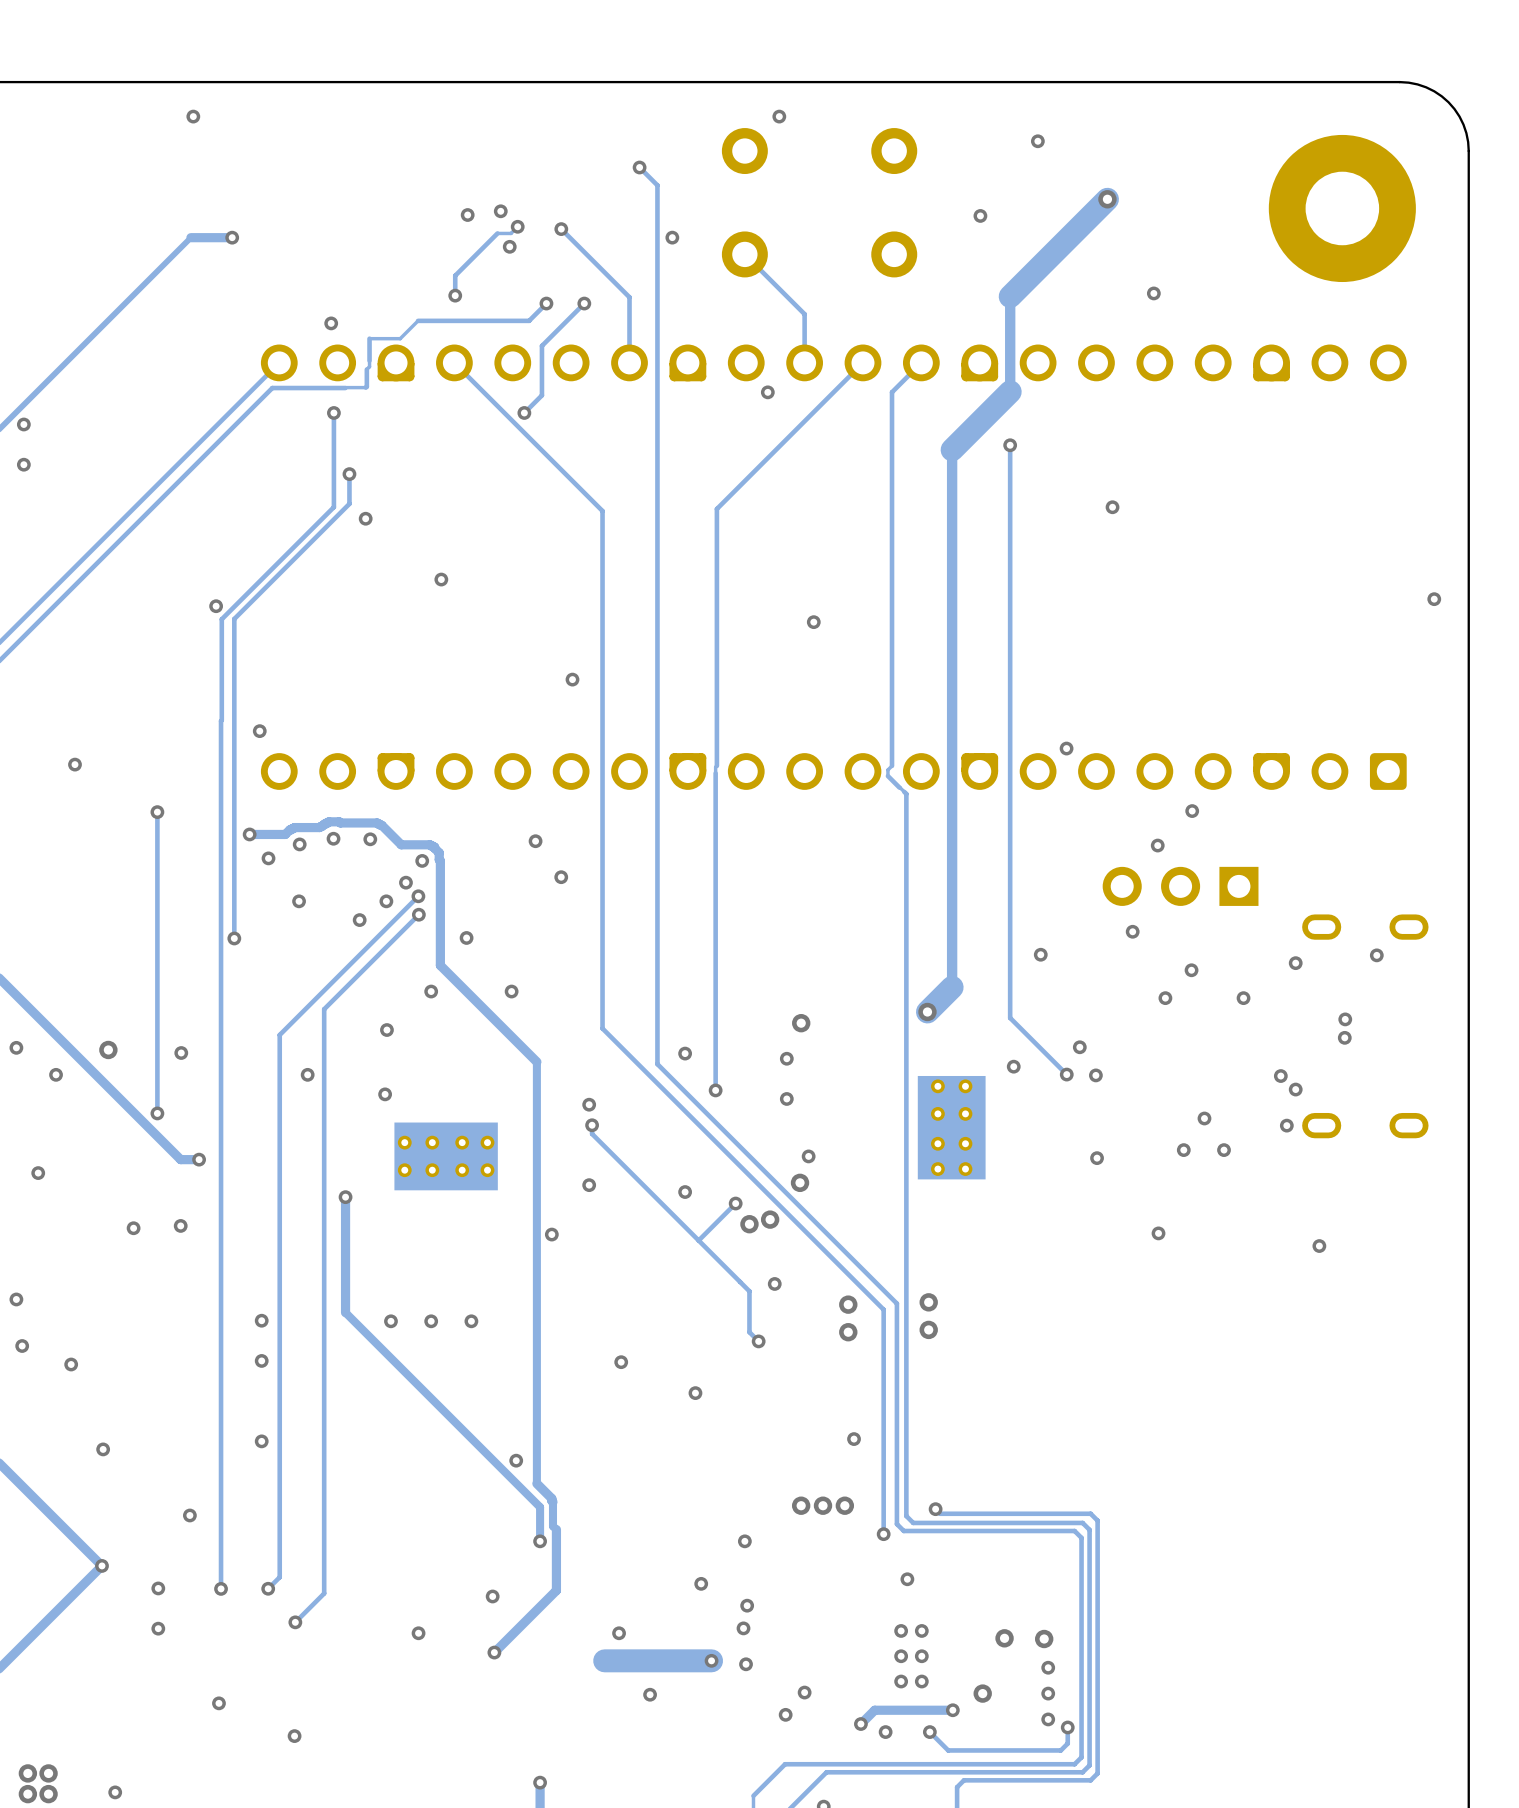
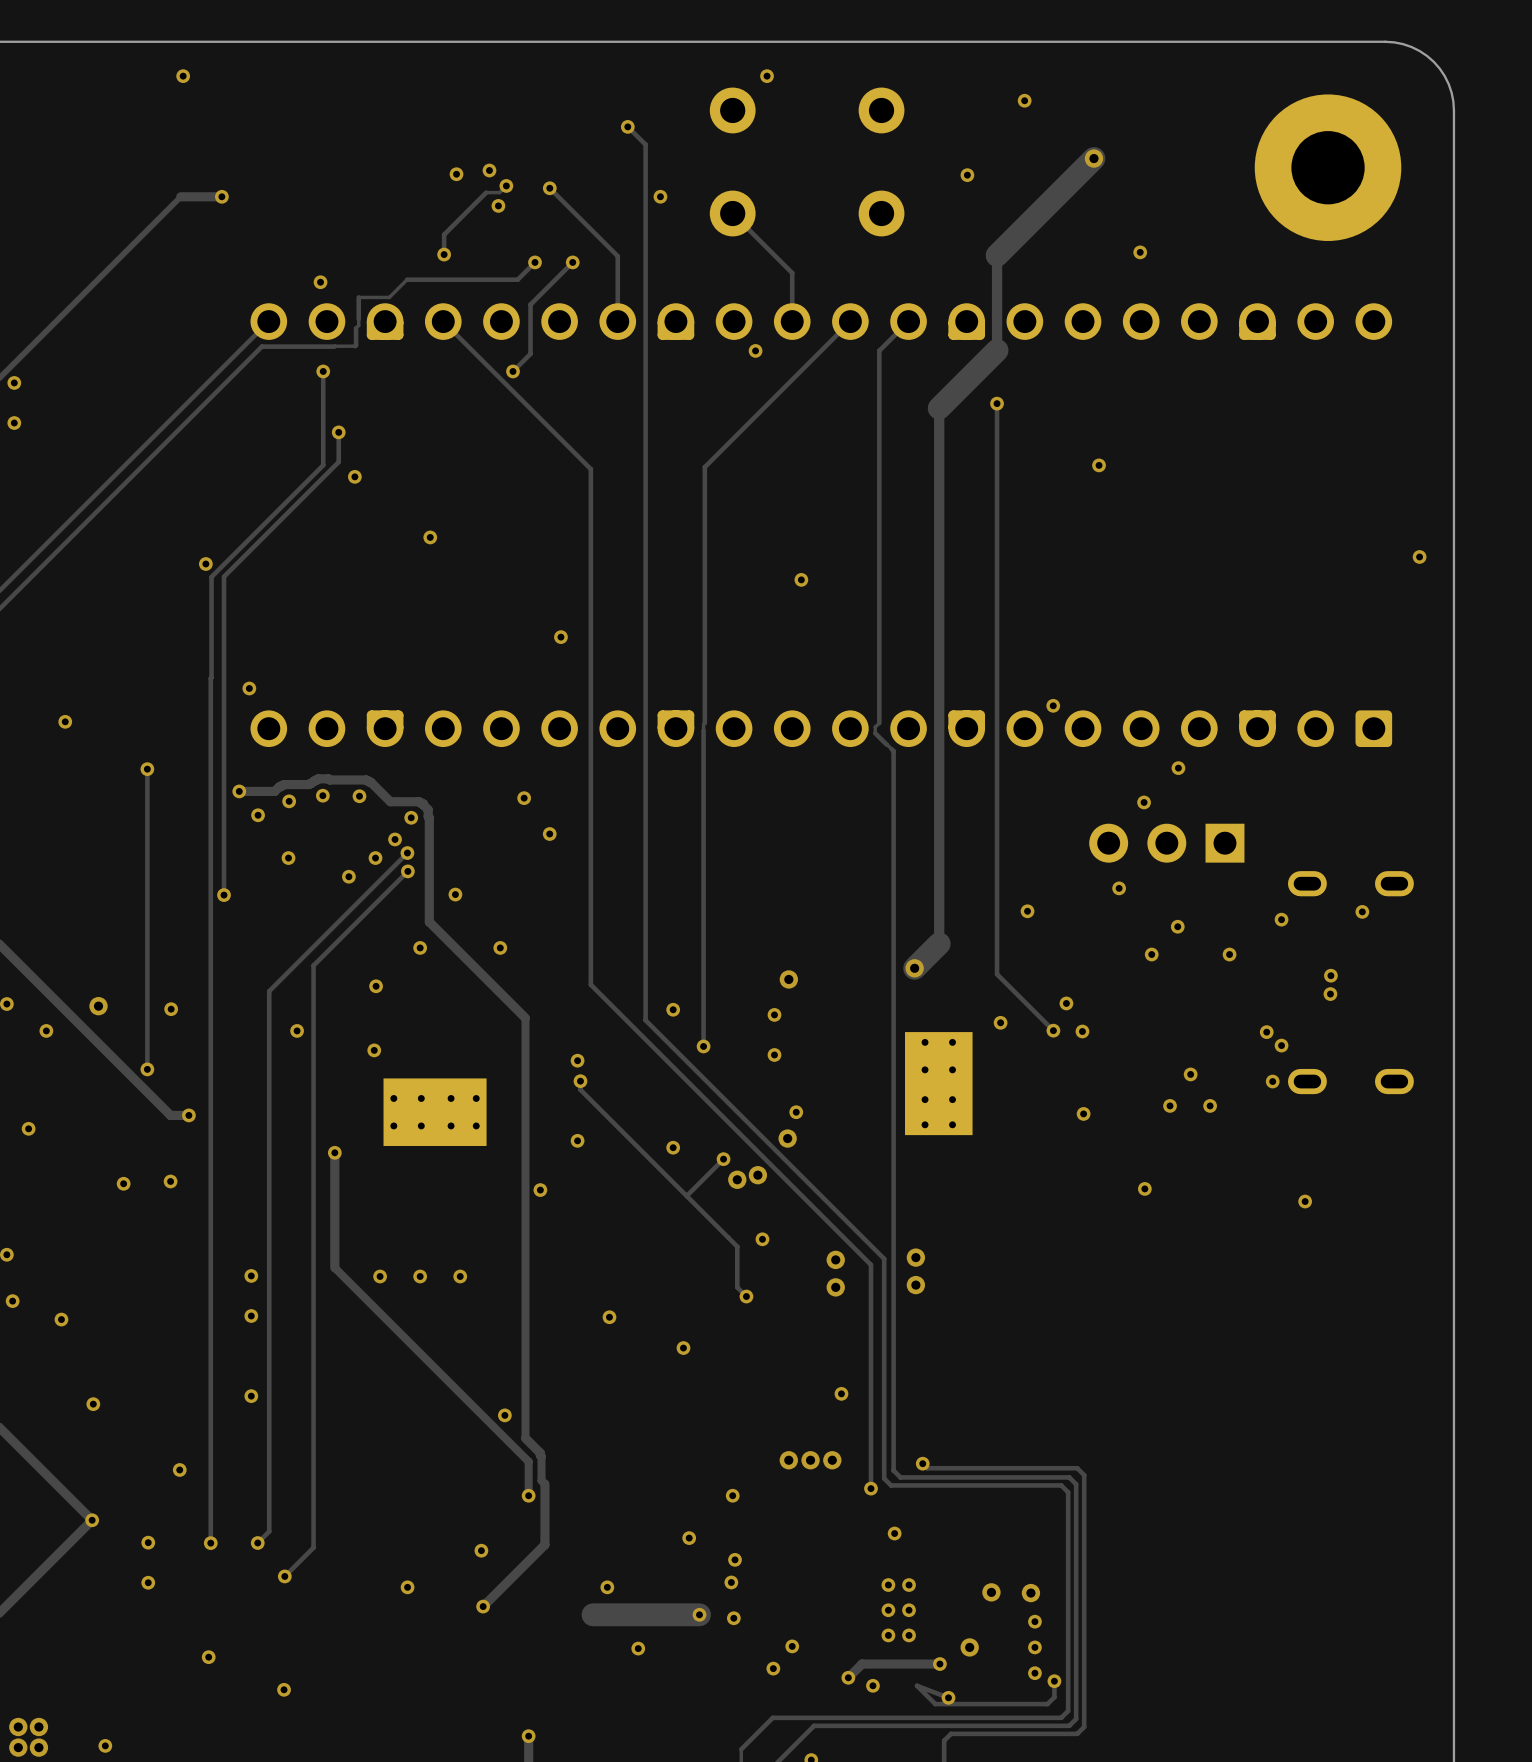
track: none -> (917, 1685) (948, 1697)
via position: (929, 1732) -> (948, 1697)

